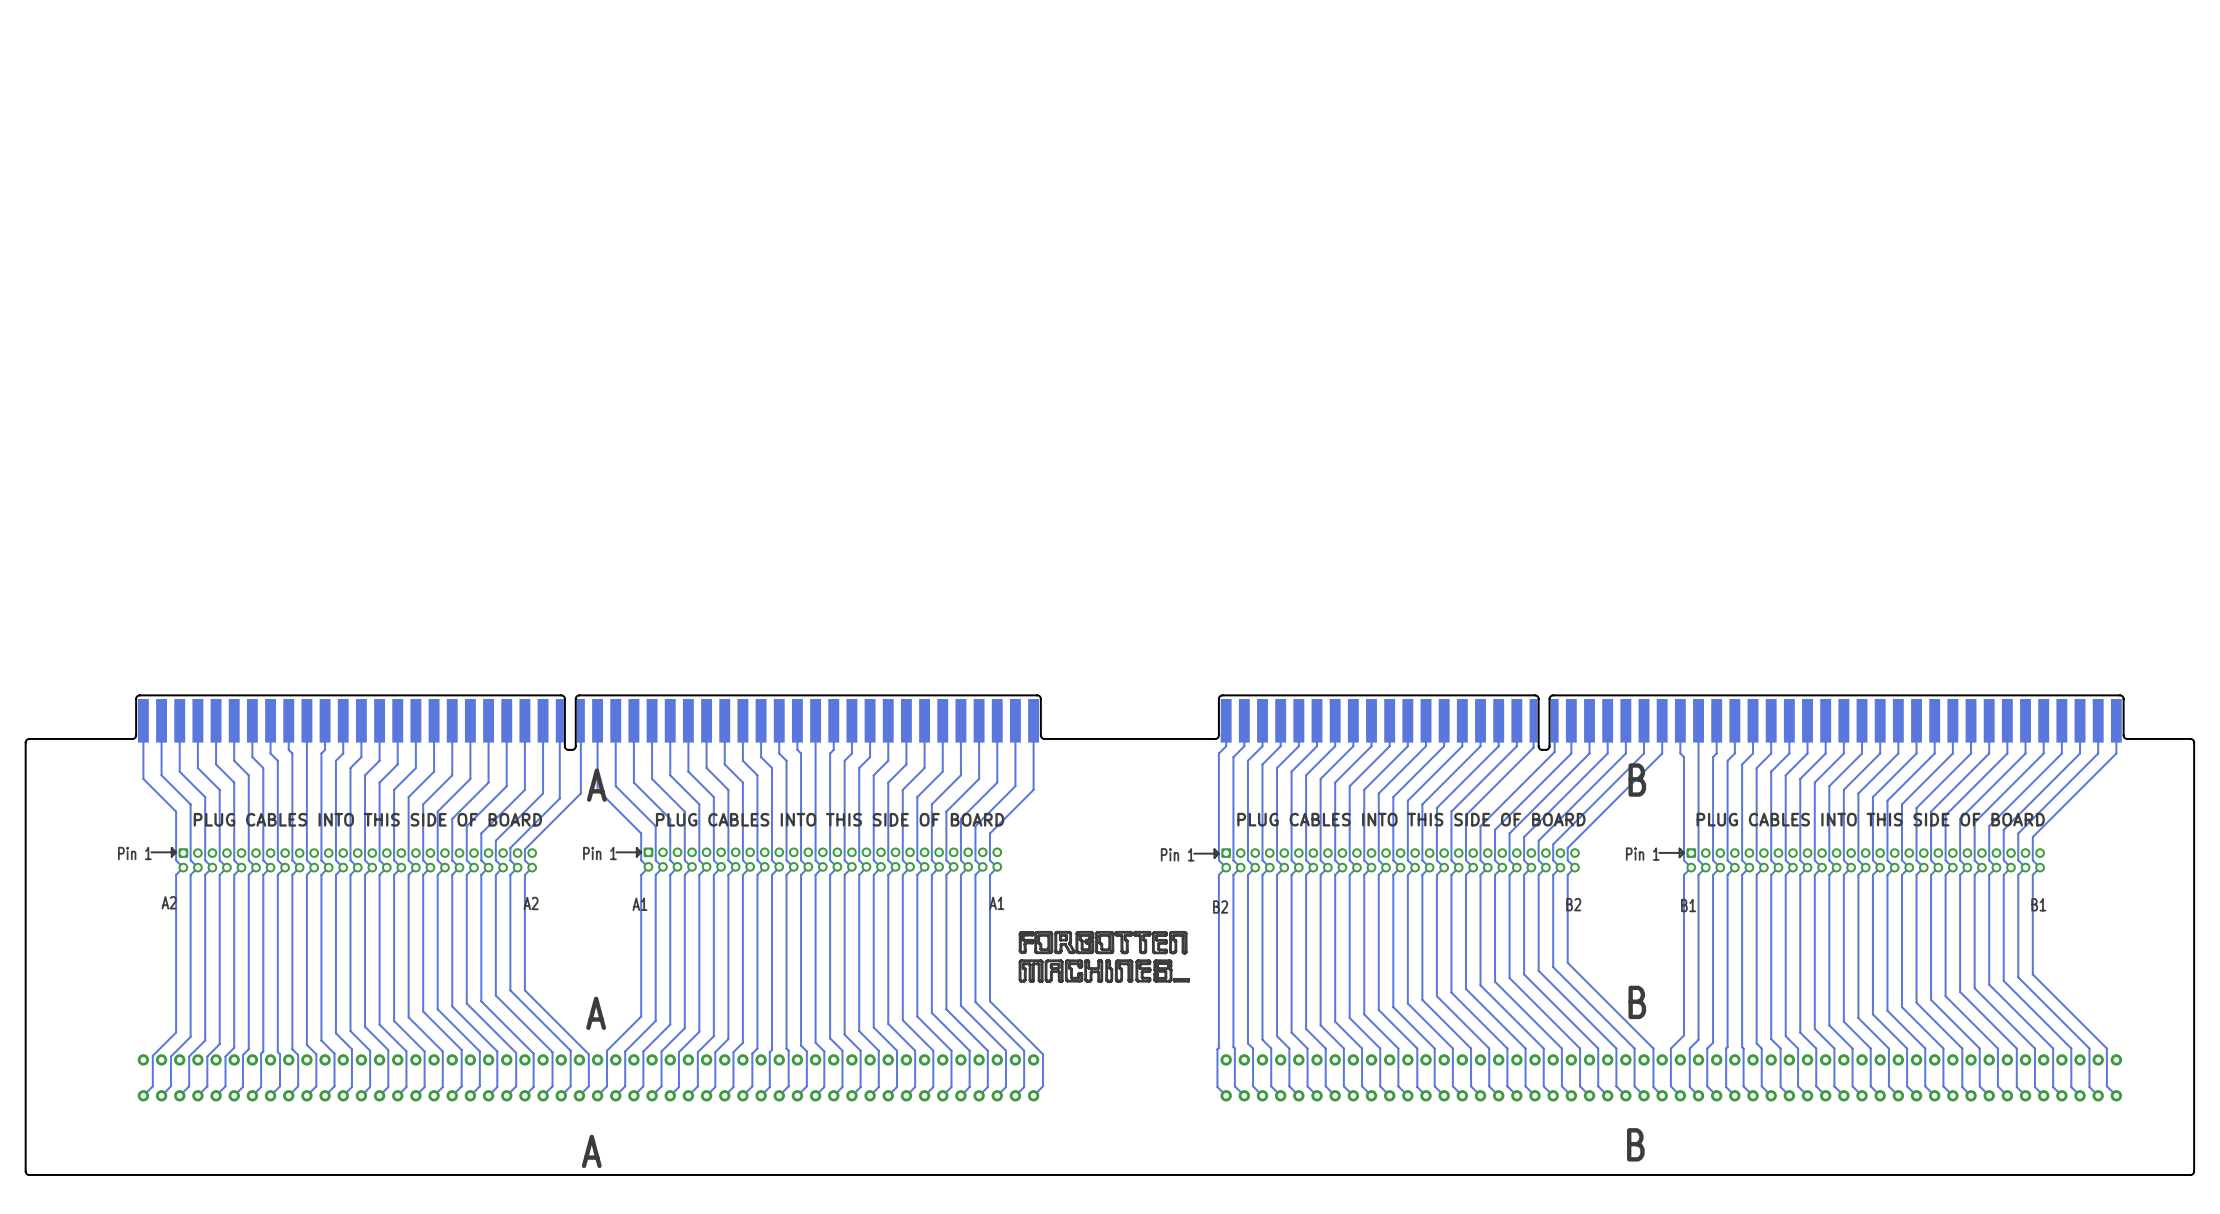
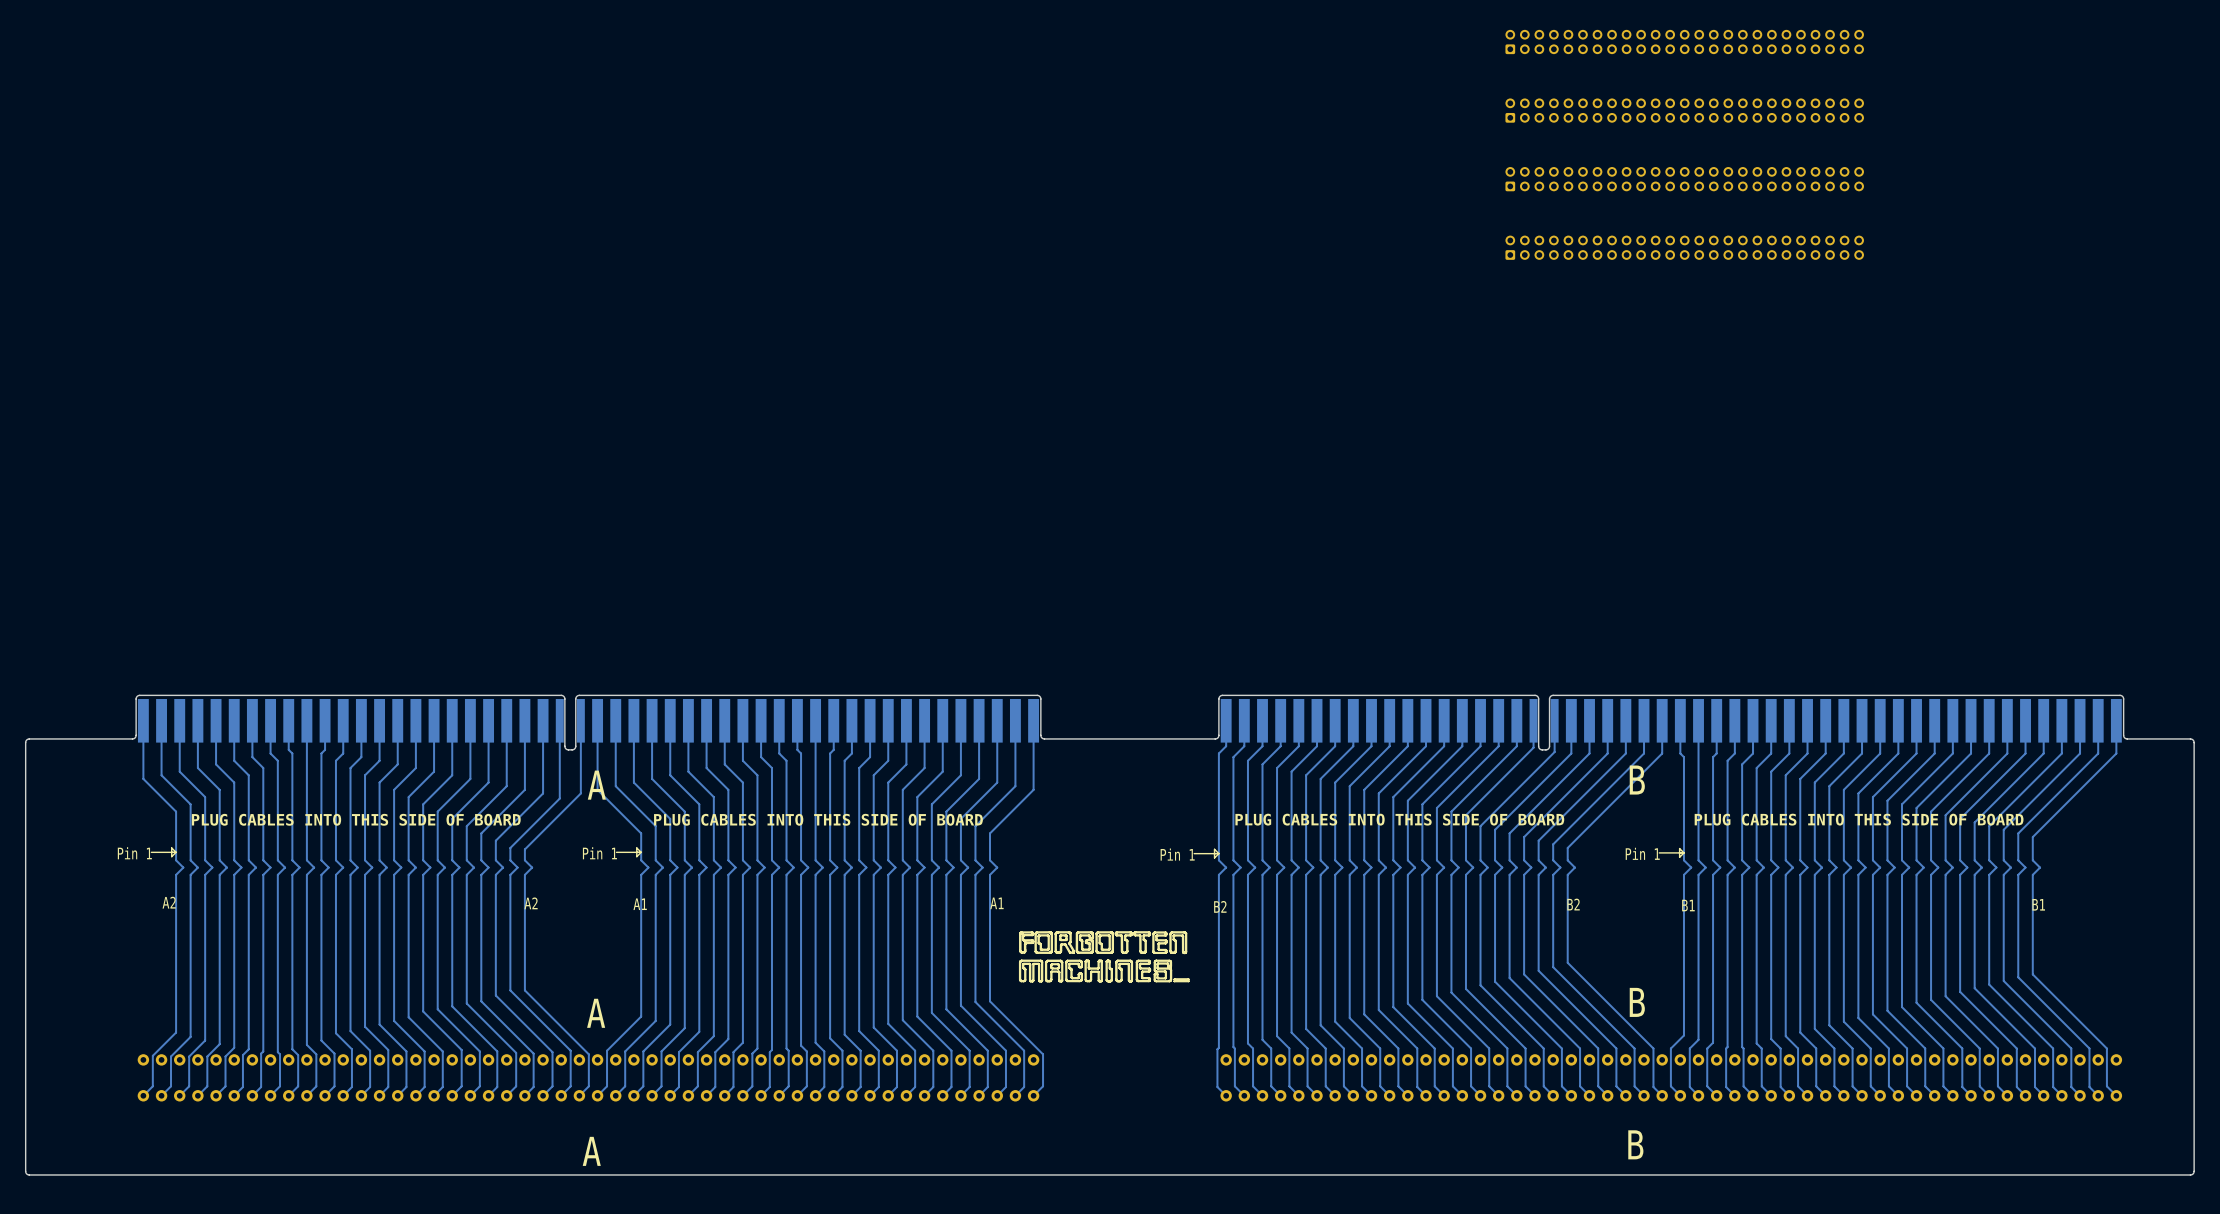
part: none -> (1684, 41)
part: none -> (1684, 110)
part: none -> (1684, 179)
part: none -> (1684, 247)
part: (822, 859) -> none
part: (357, 860) -> none
part: (1400, 860) -> none
part: (1865, 860) -> none

